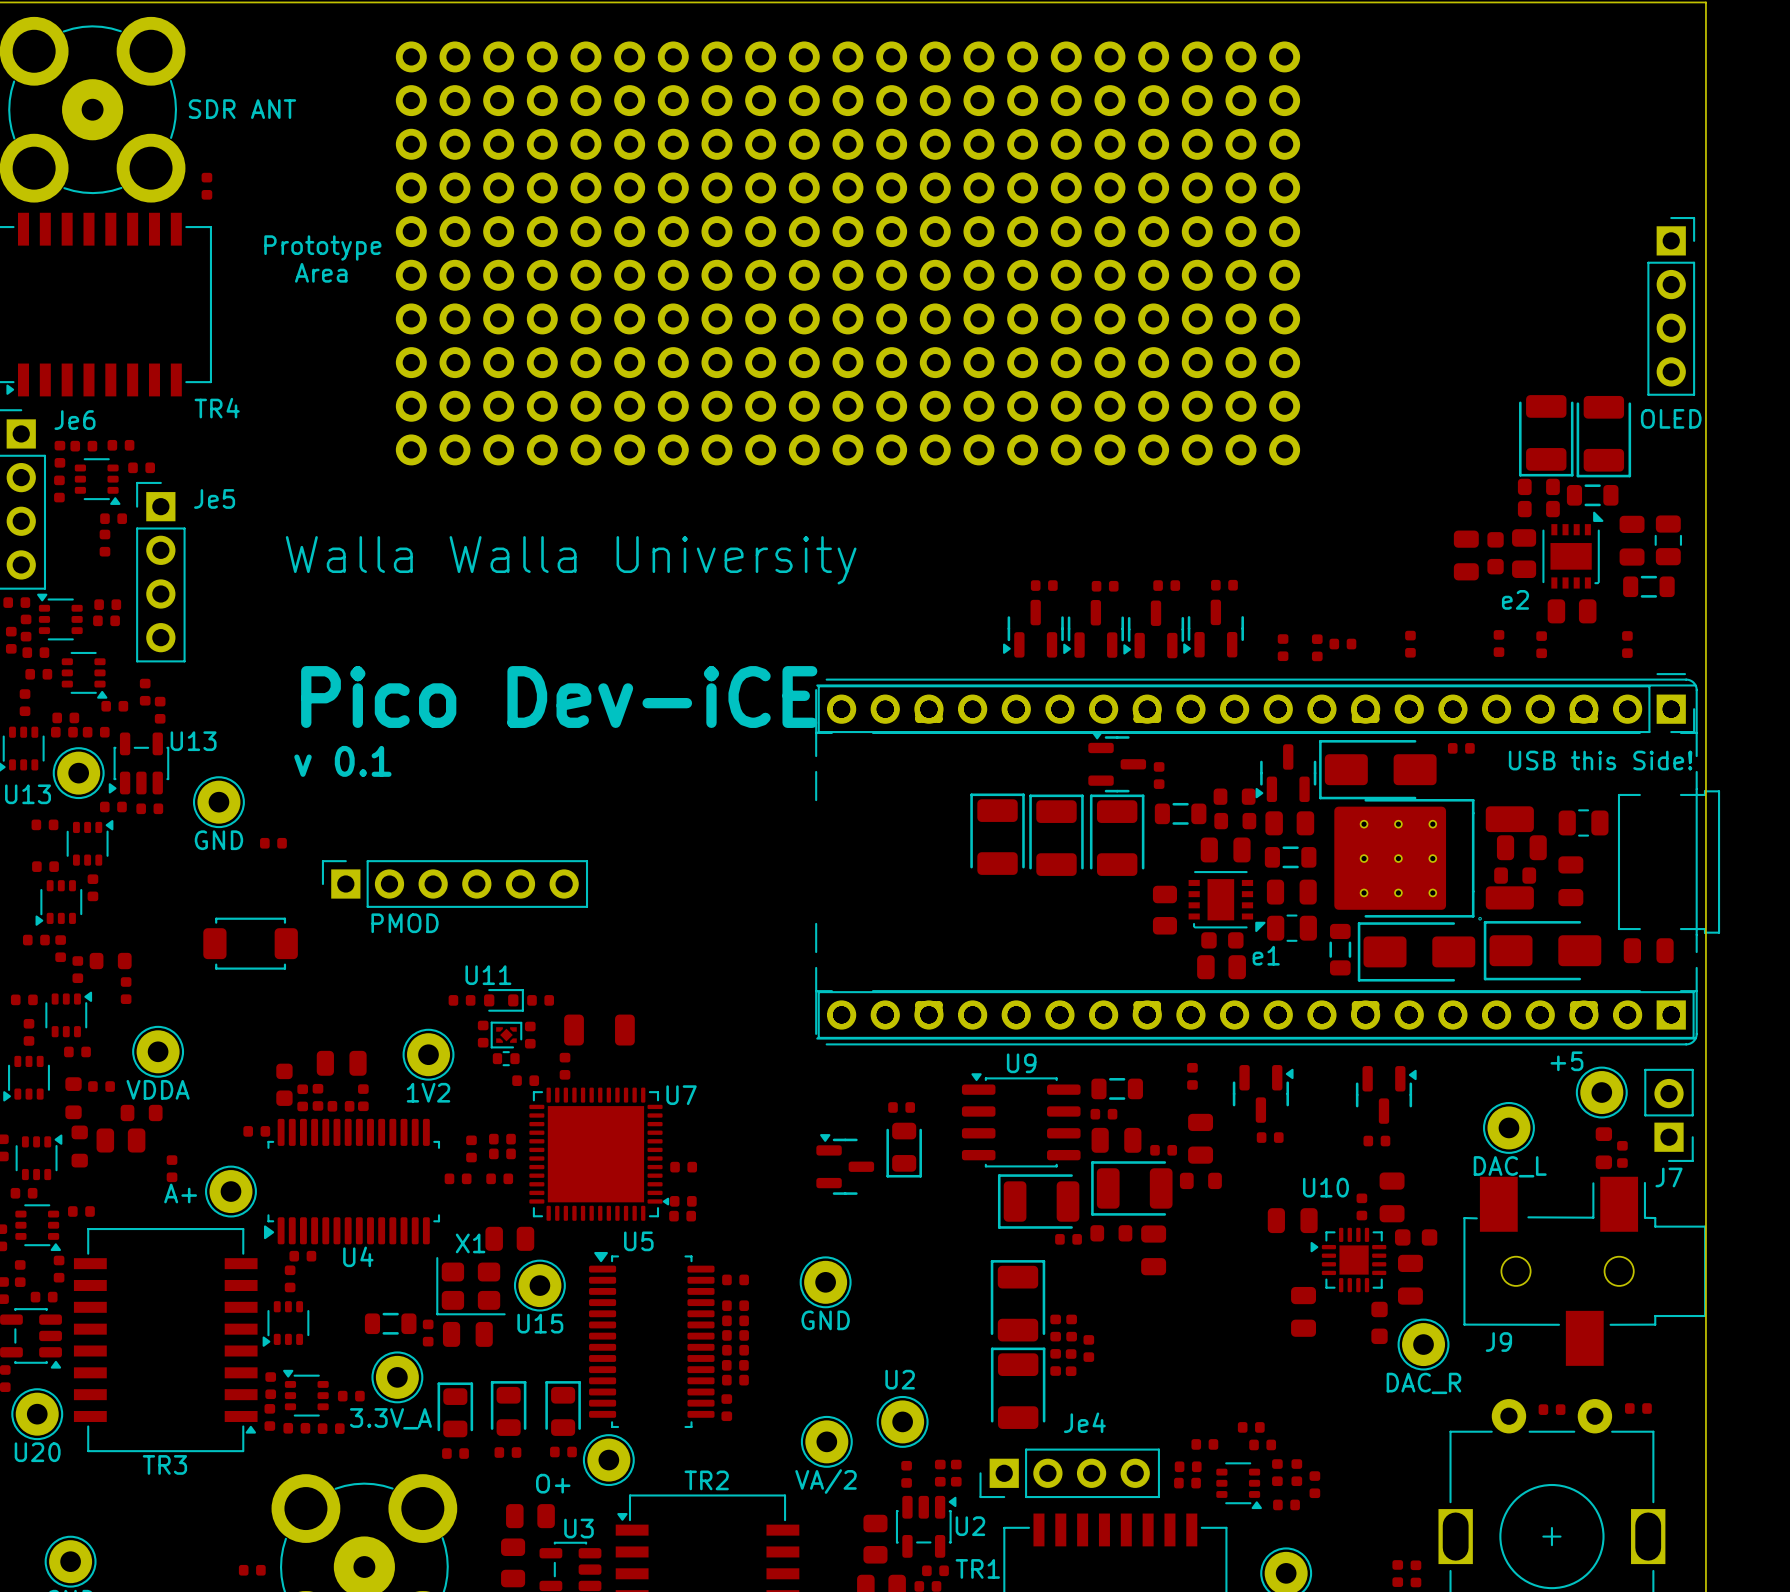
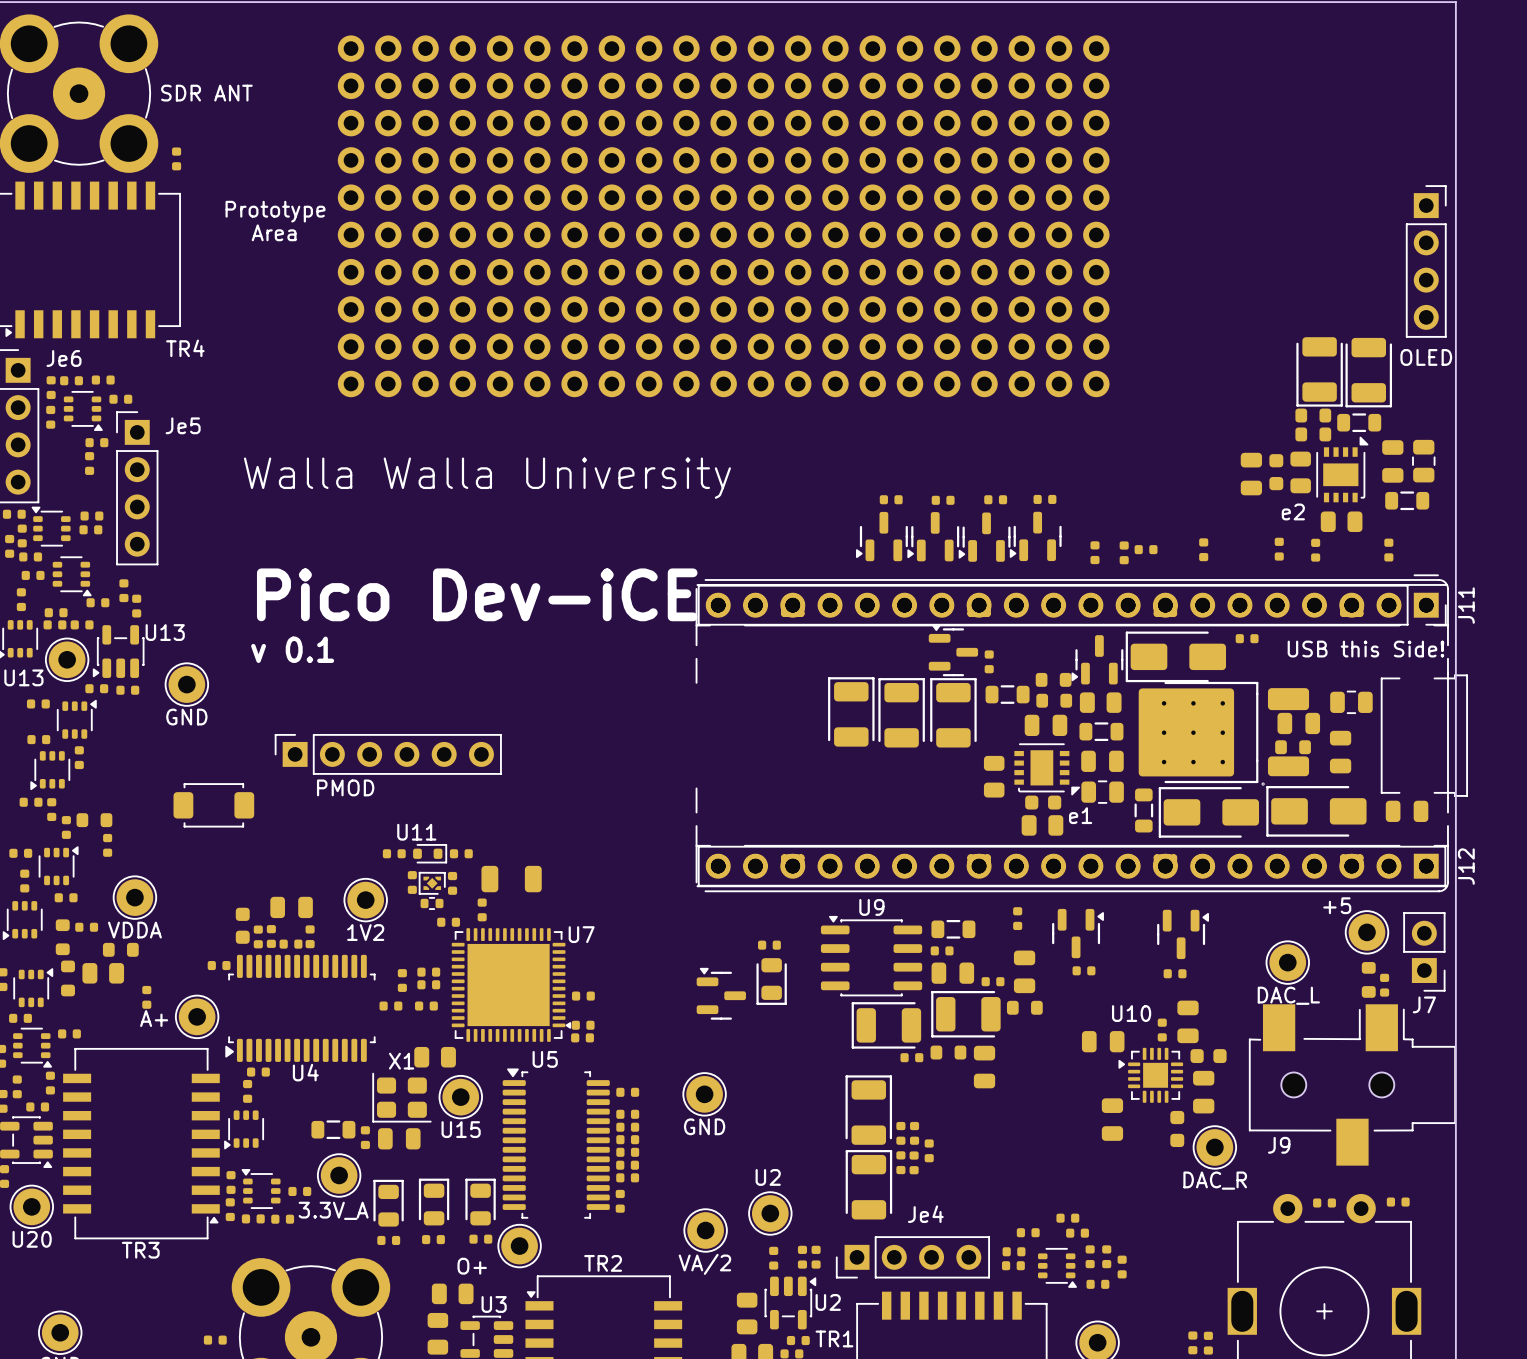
J11 name: none -> J11 (1466, 605)
part: (273, 843) -> none
J12 name: none -> J12 (1466, 866)

